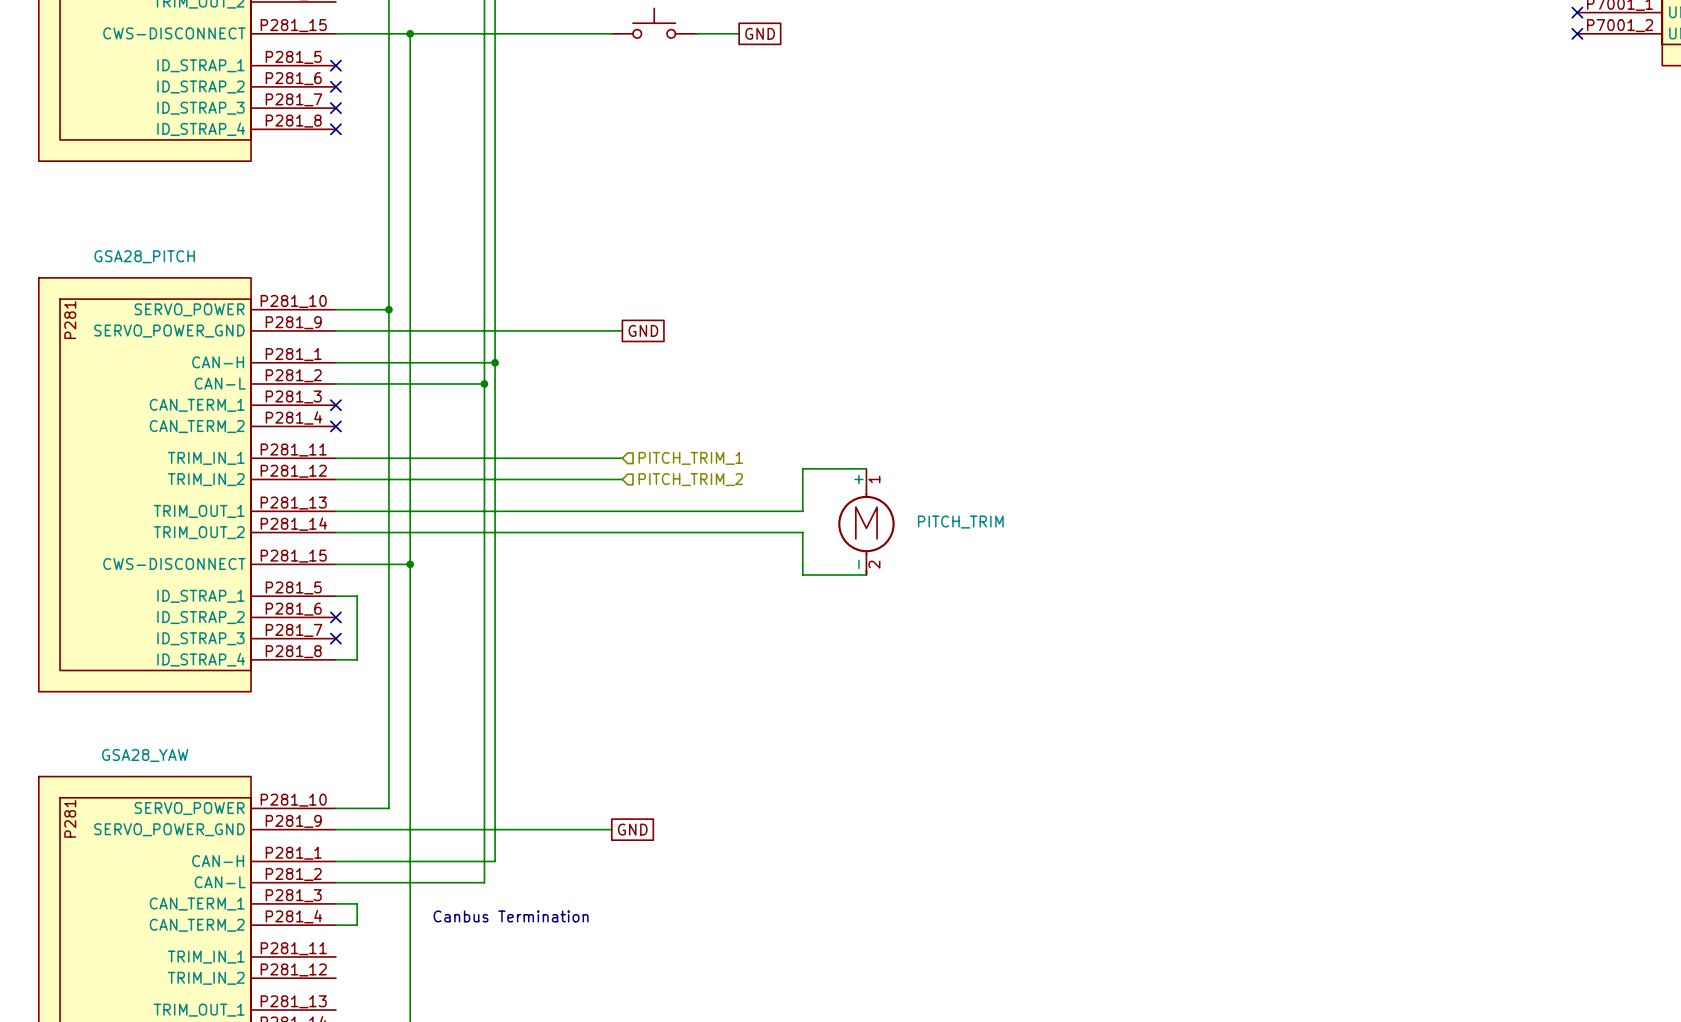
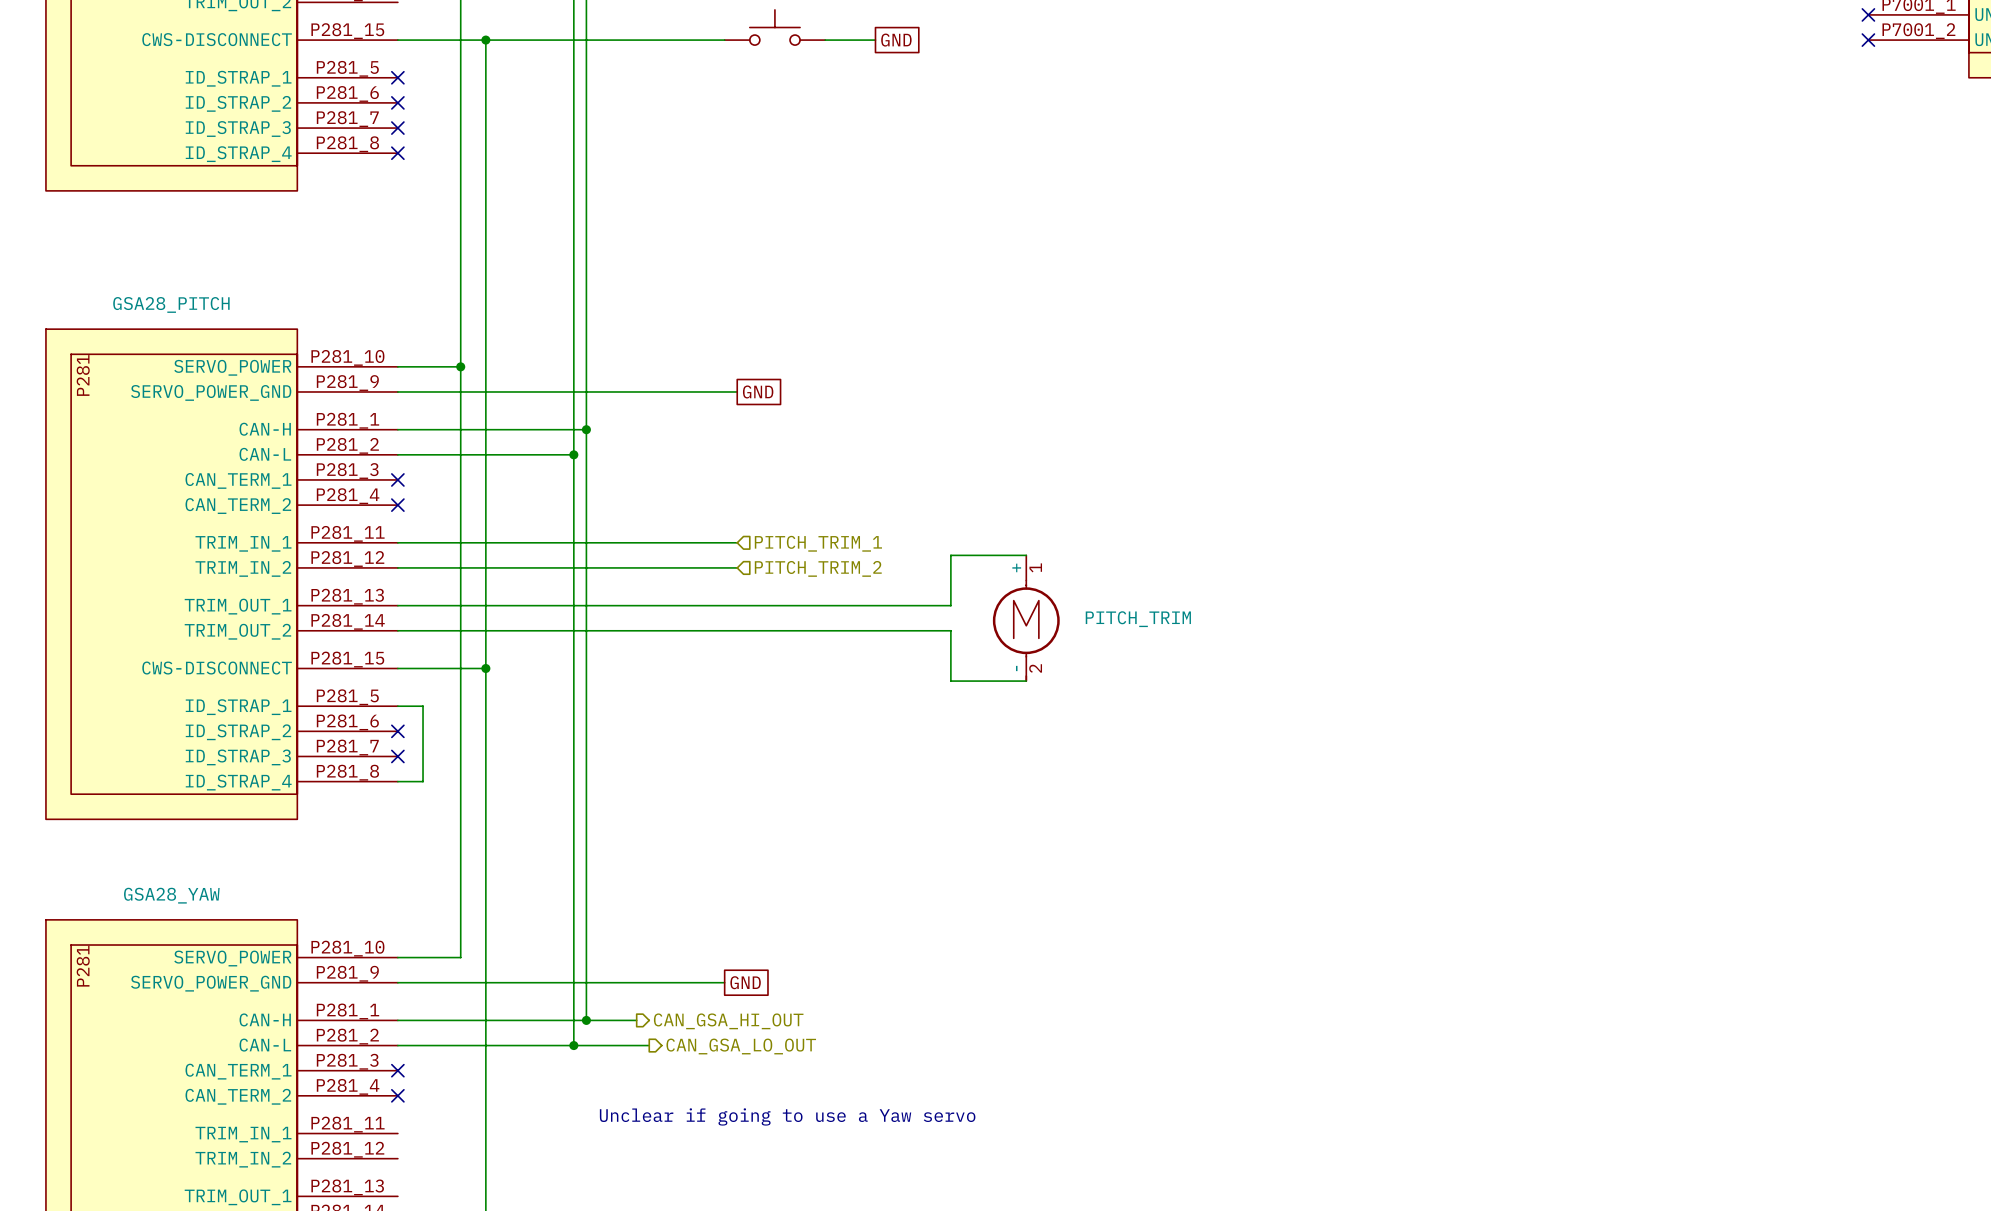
wire: none -> (586, 1020) (636, 1020)
junction: none -> (586, 1020)
hierarchical label: none -> CAN_GSA_HI_OUT (728, 1021)
wire: none -> (573, 1045) (649, 1045)
junction: none -> (573, 1045)
hierarchical label: none -> CAN_GSA_LO_OUT (741, 1046)
wire: (335, 903) (357, 903) (357, 925) (335, 925) -> none
no-connect mark: none -> (397, 1070)
text: Canbus Termination (511, 916) -> none
no-connect mark: none -> (397, 1095)
text: none -> Unclear if going to use a Yaw servo (787, 1116)

